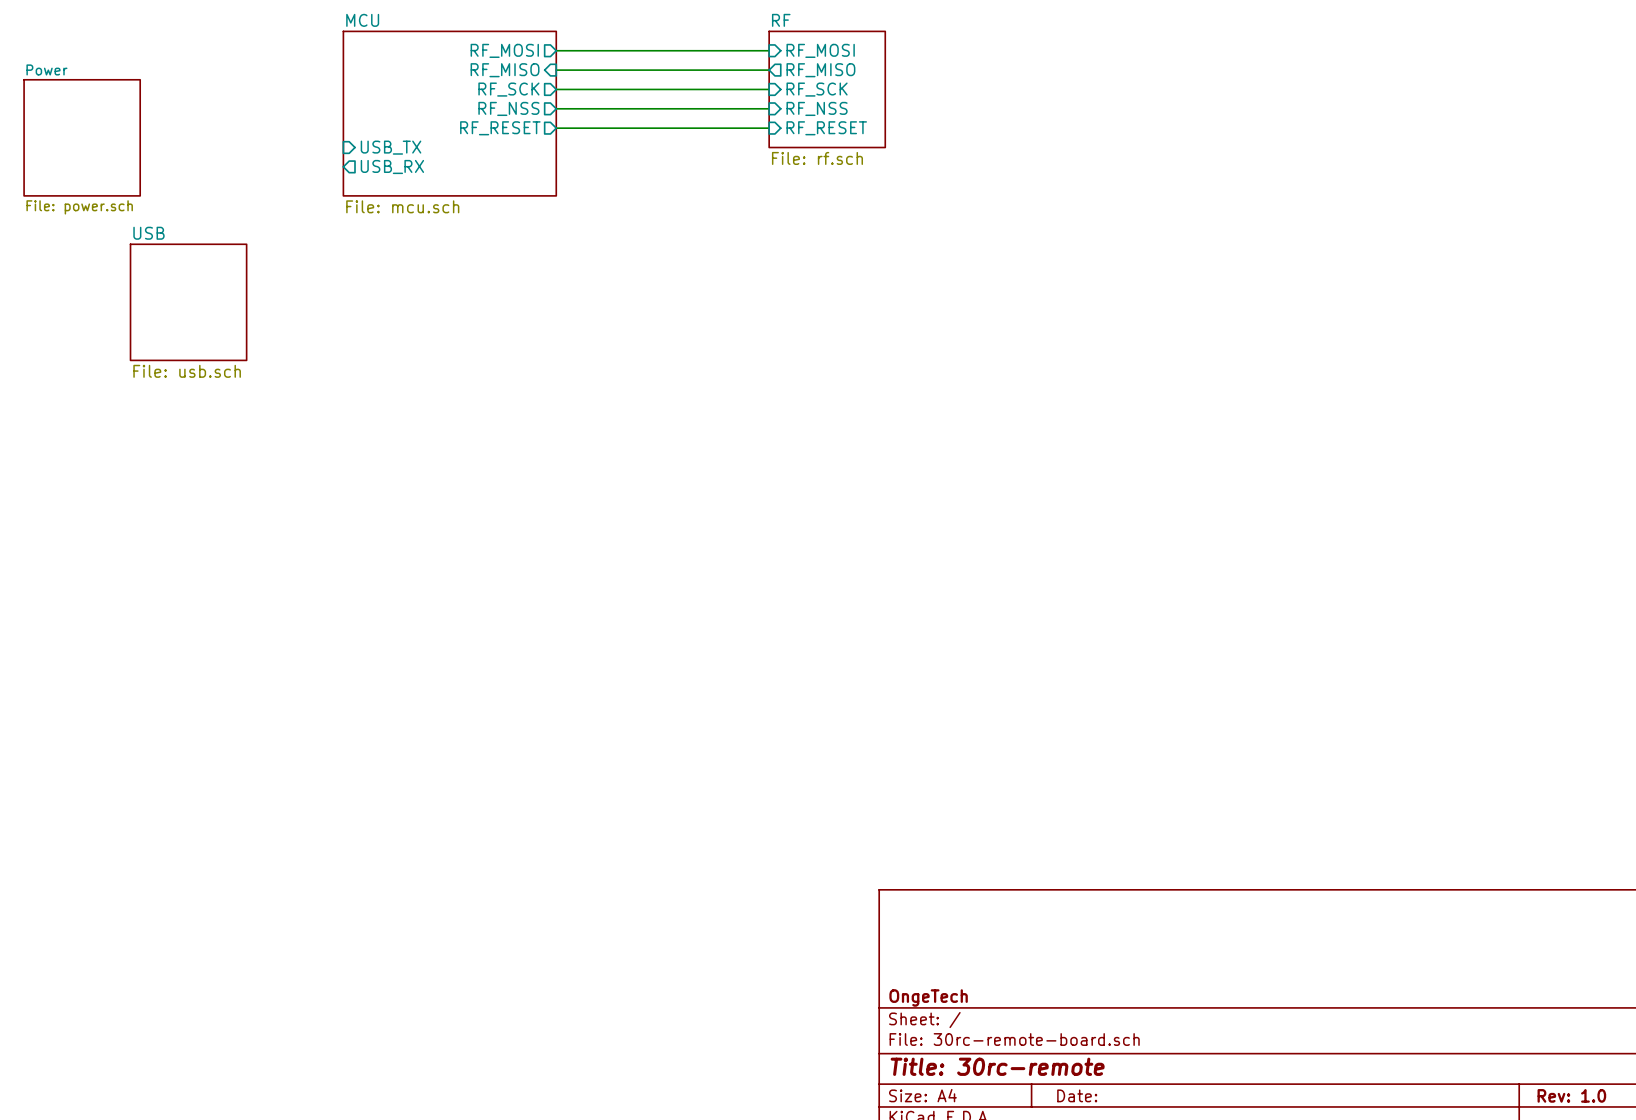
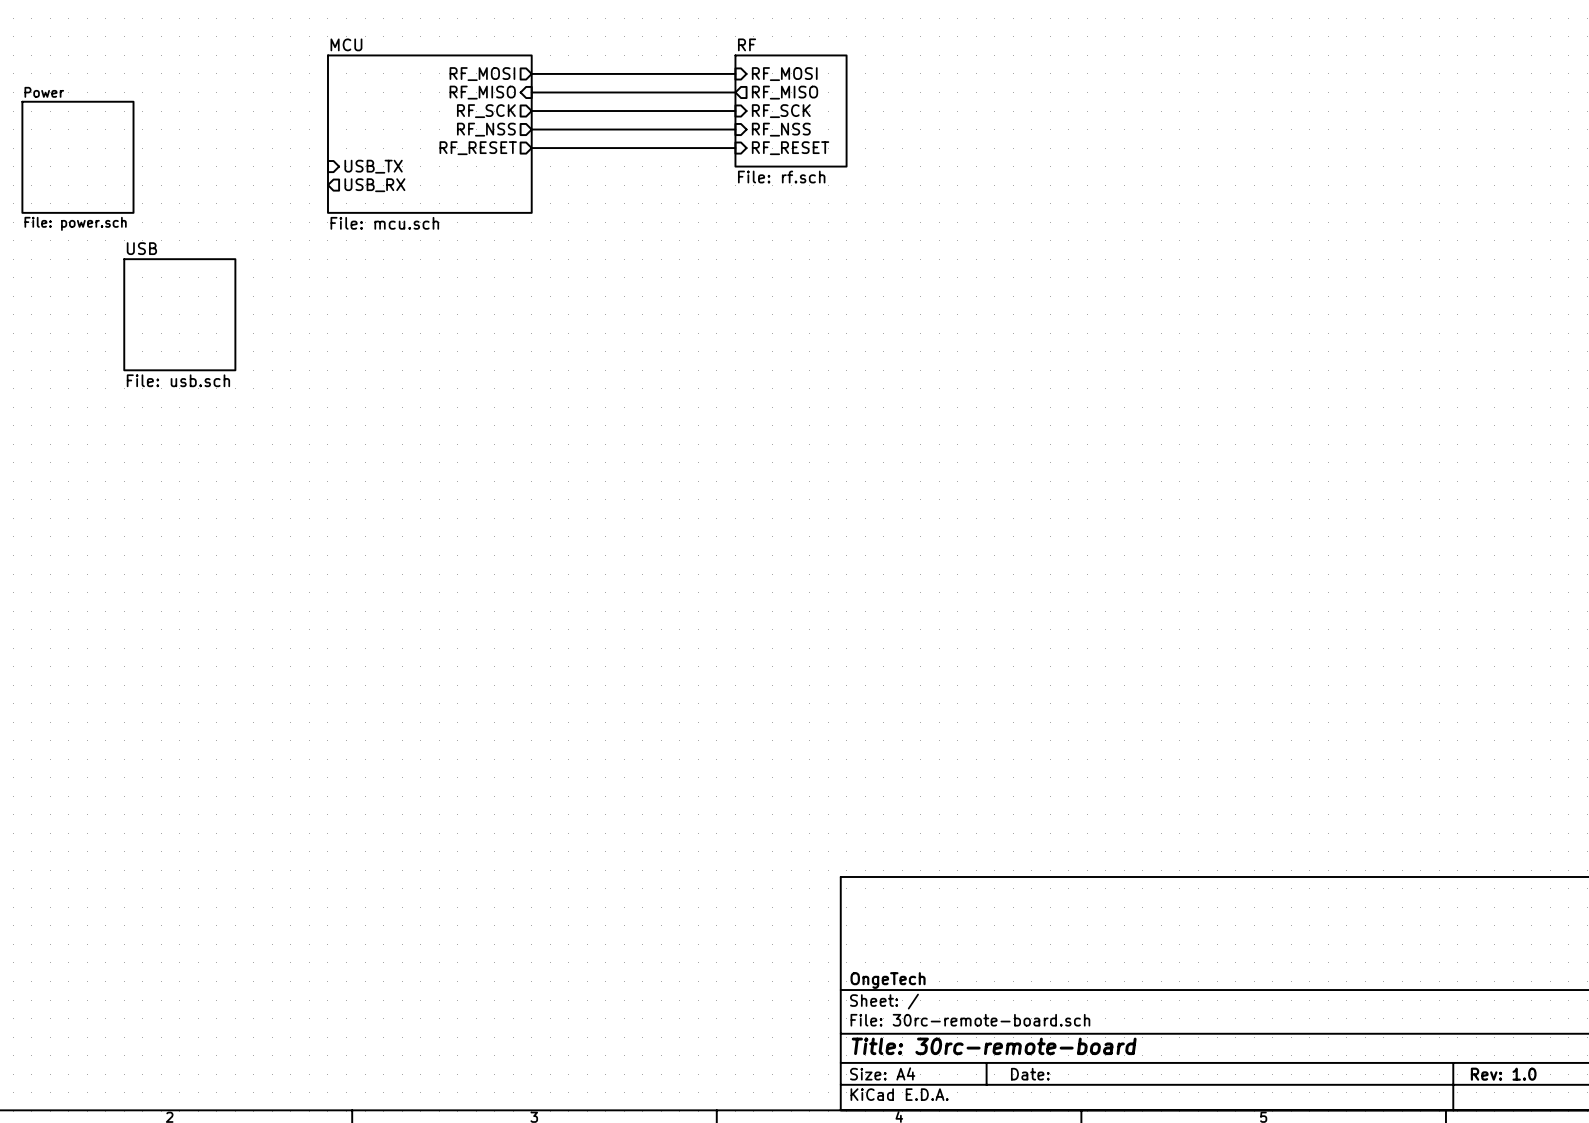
title block: Title: 30rc-remote (997, 1066) -> Title: 30rc-remote-board (994, 1046)

